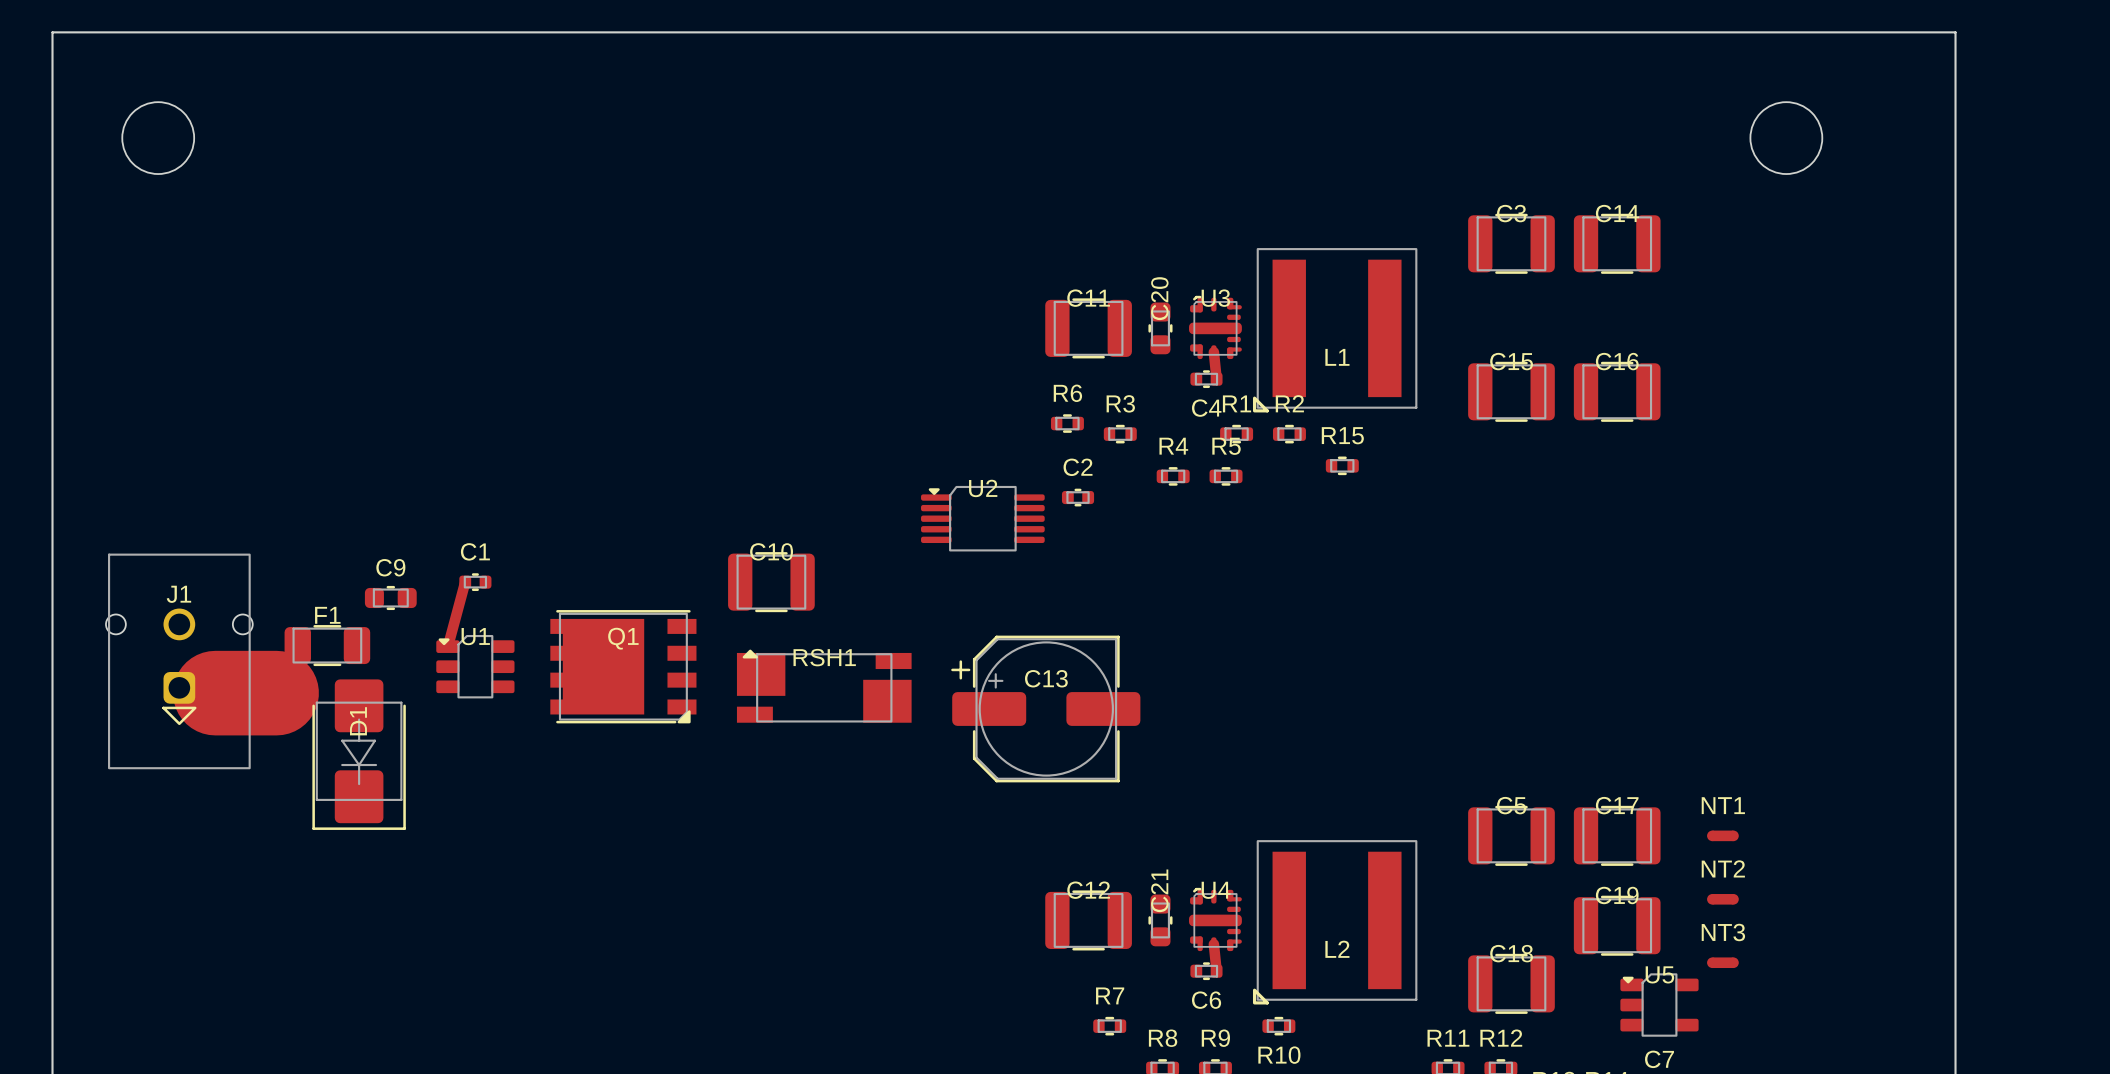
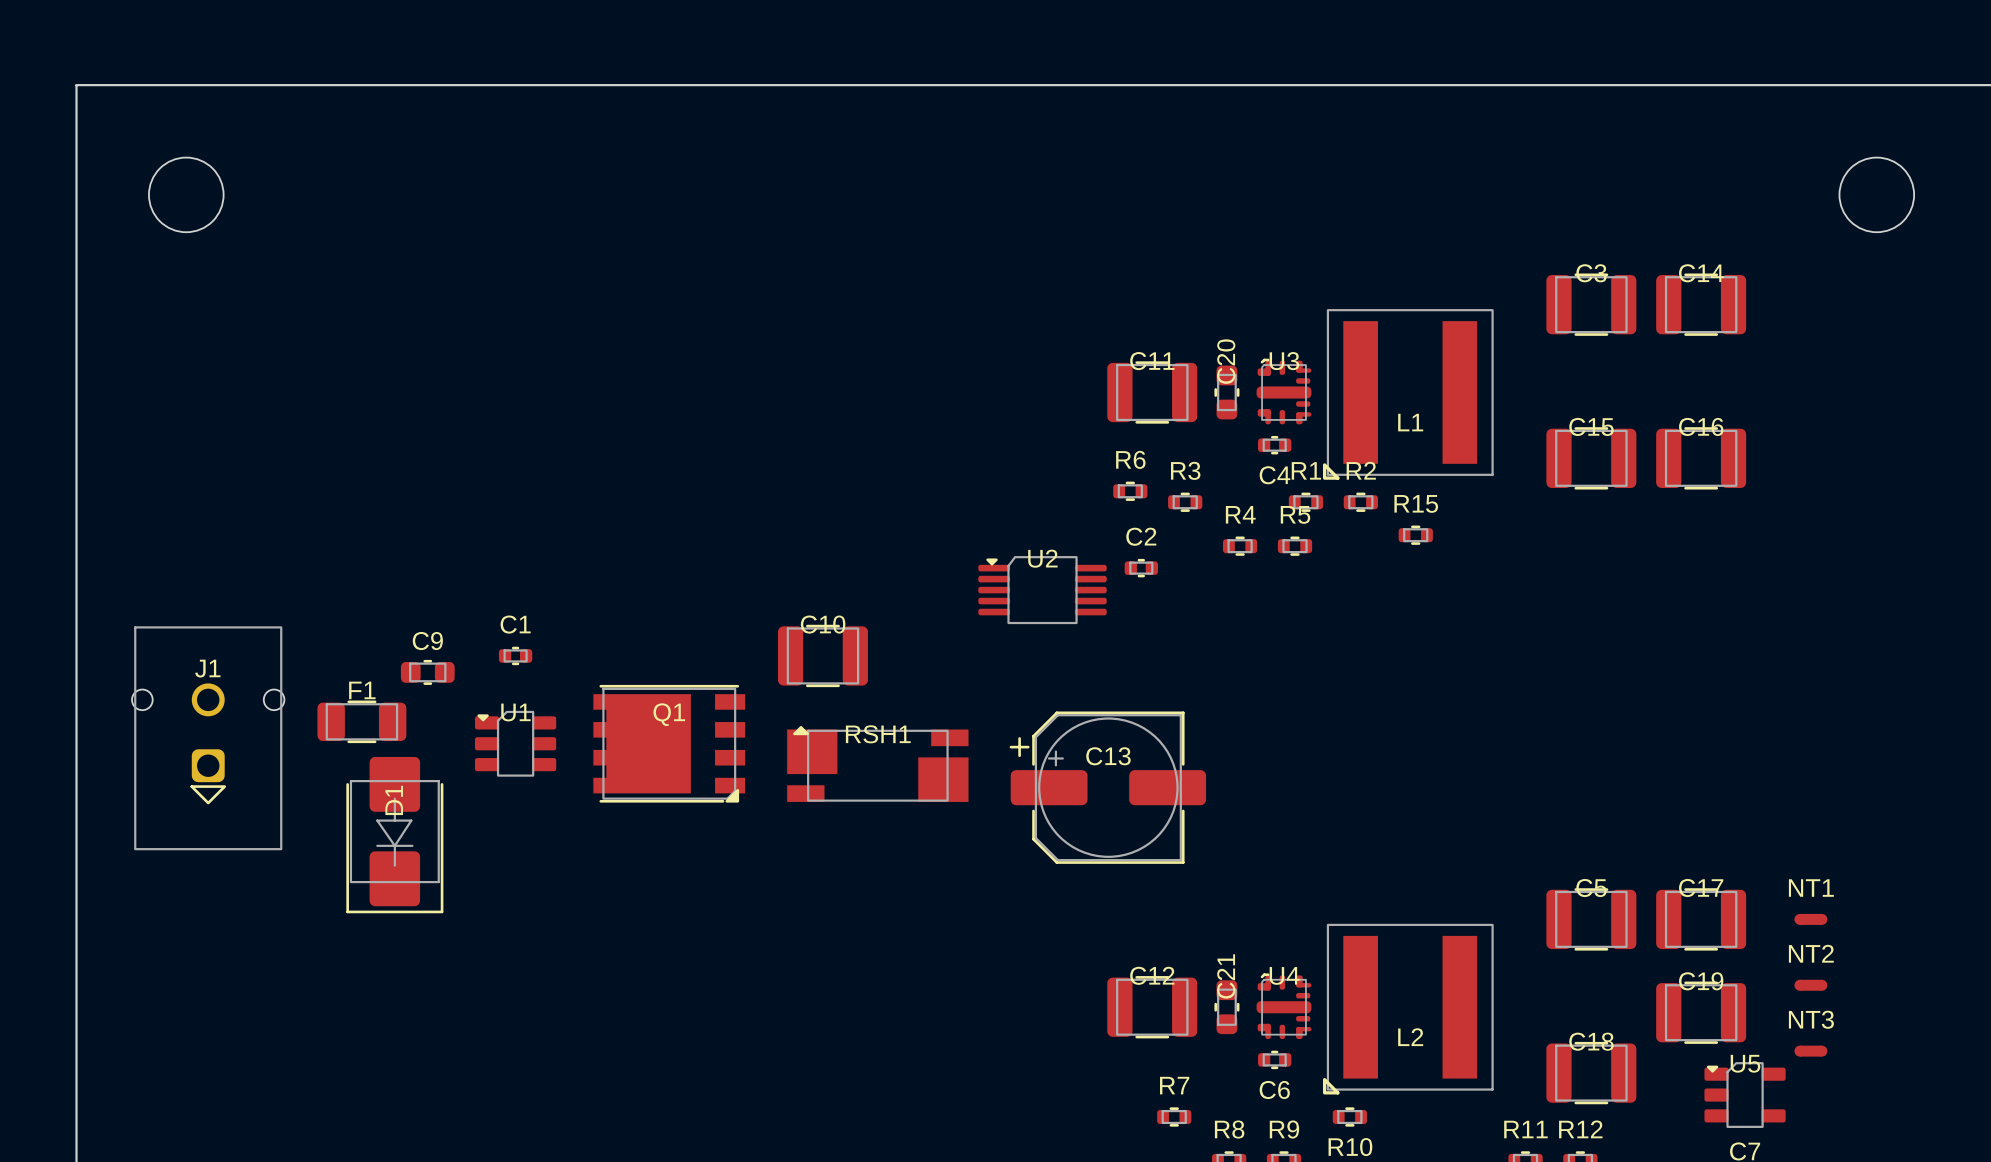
track: (1213, 352) (1216, 379) -> none
track: (465, 582) (447, 646) -> none
track: (215, 693) (276, 693) -> none
track: (1213, 944) (1216, 971) -> none

